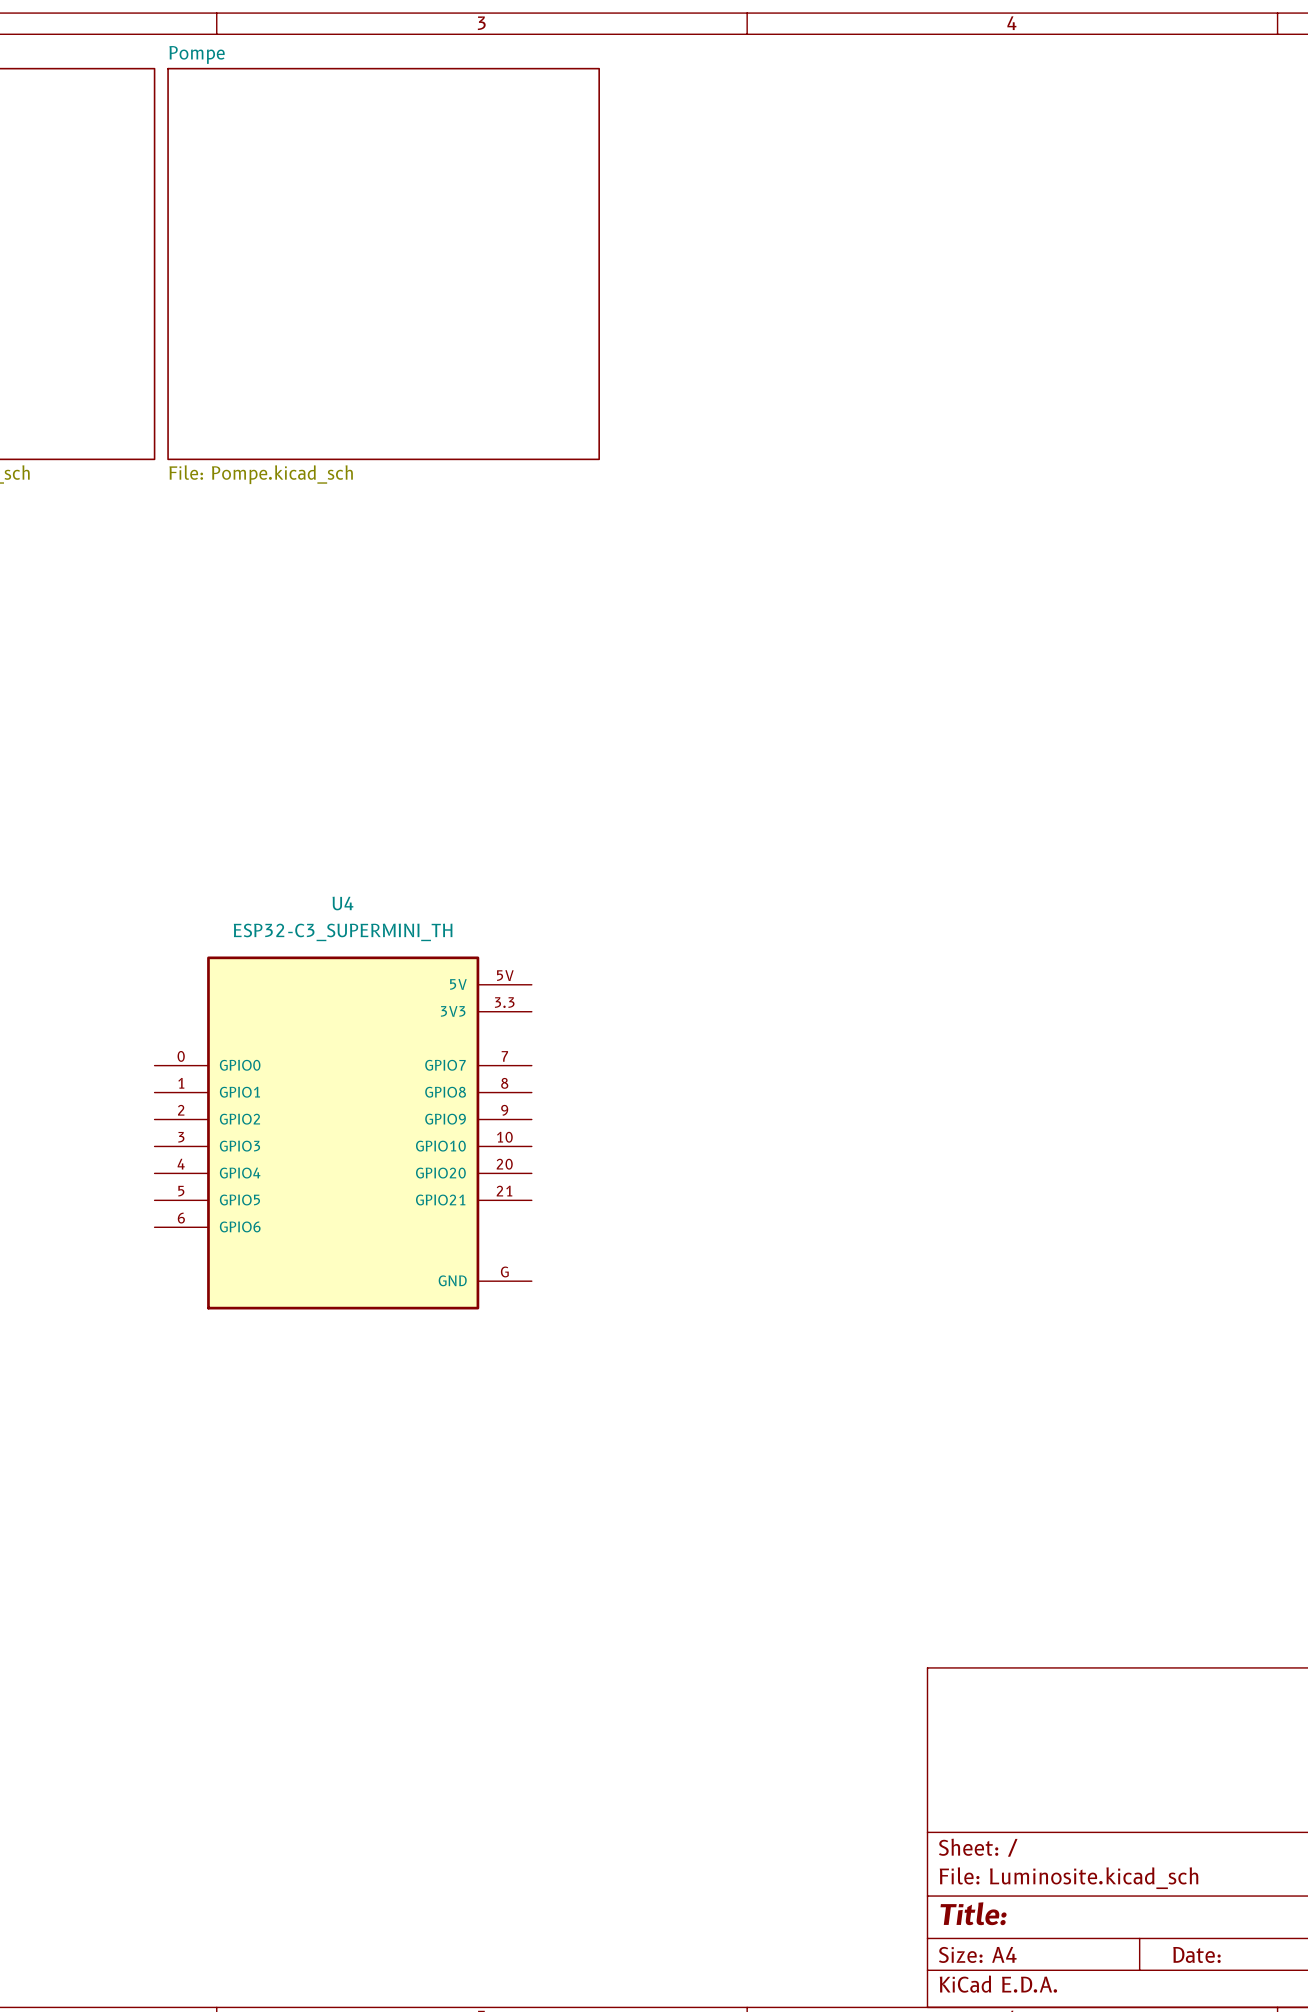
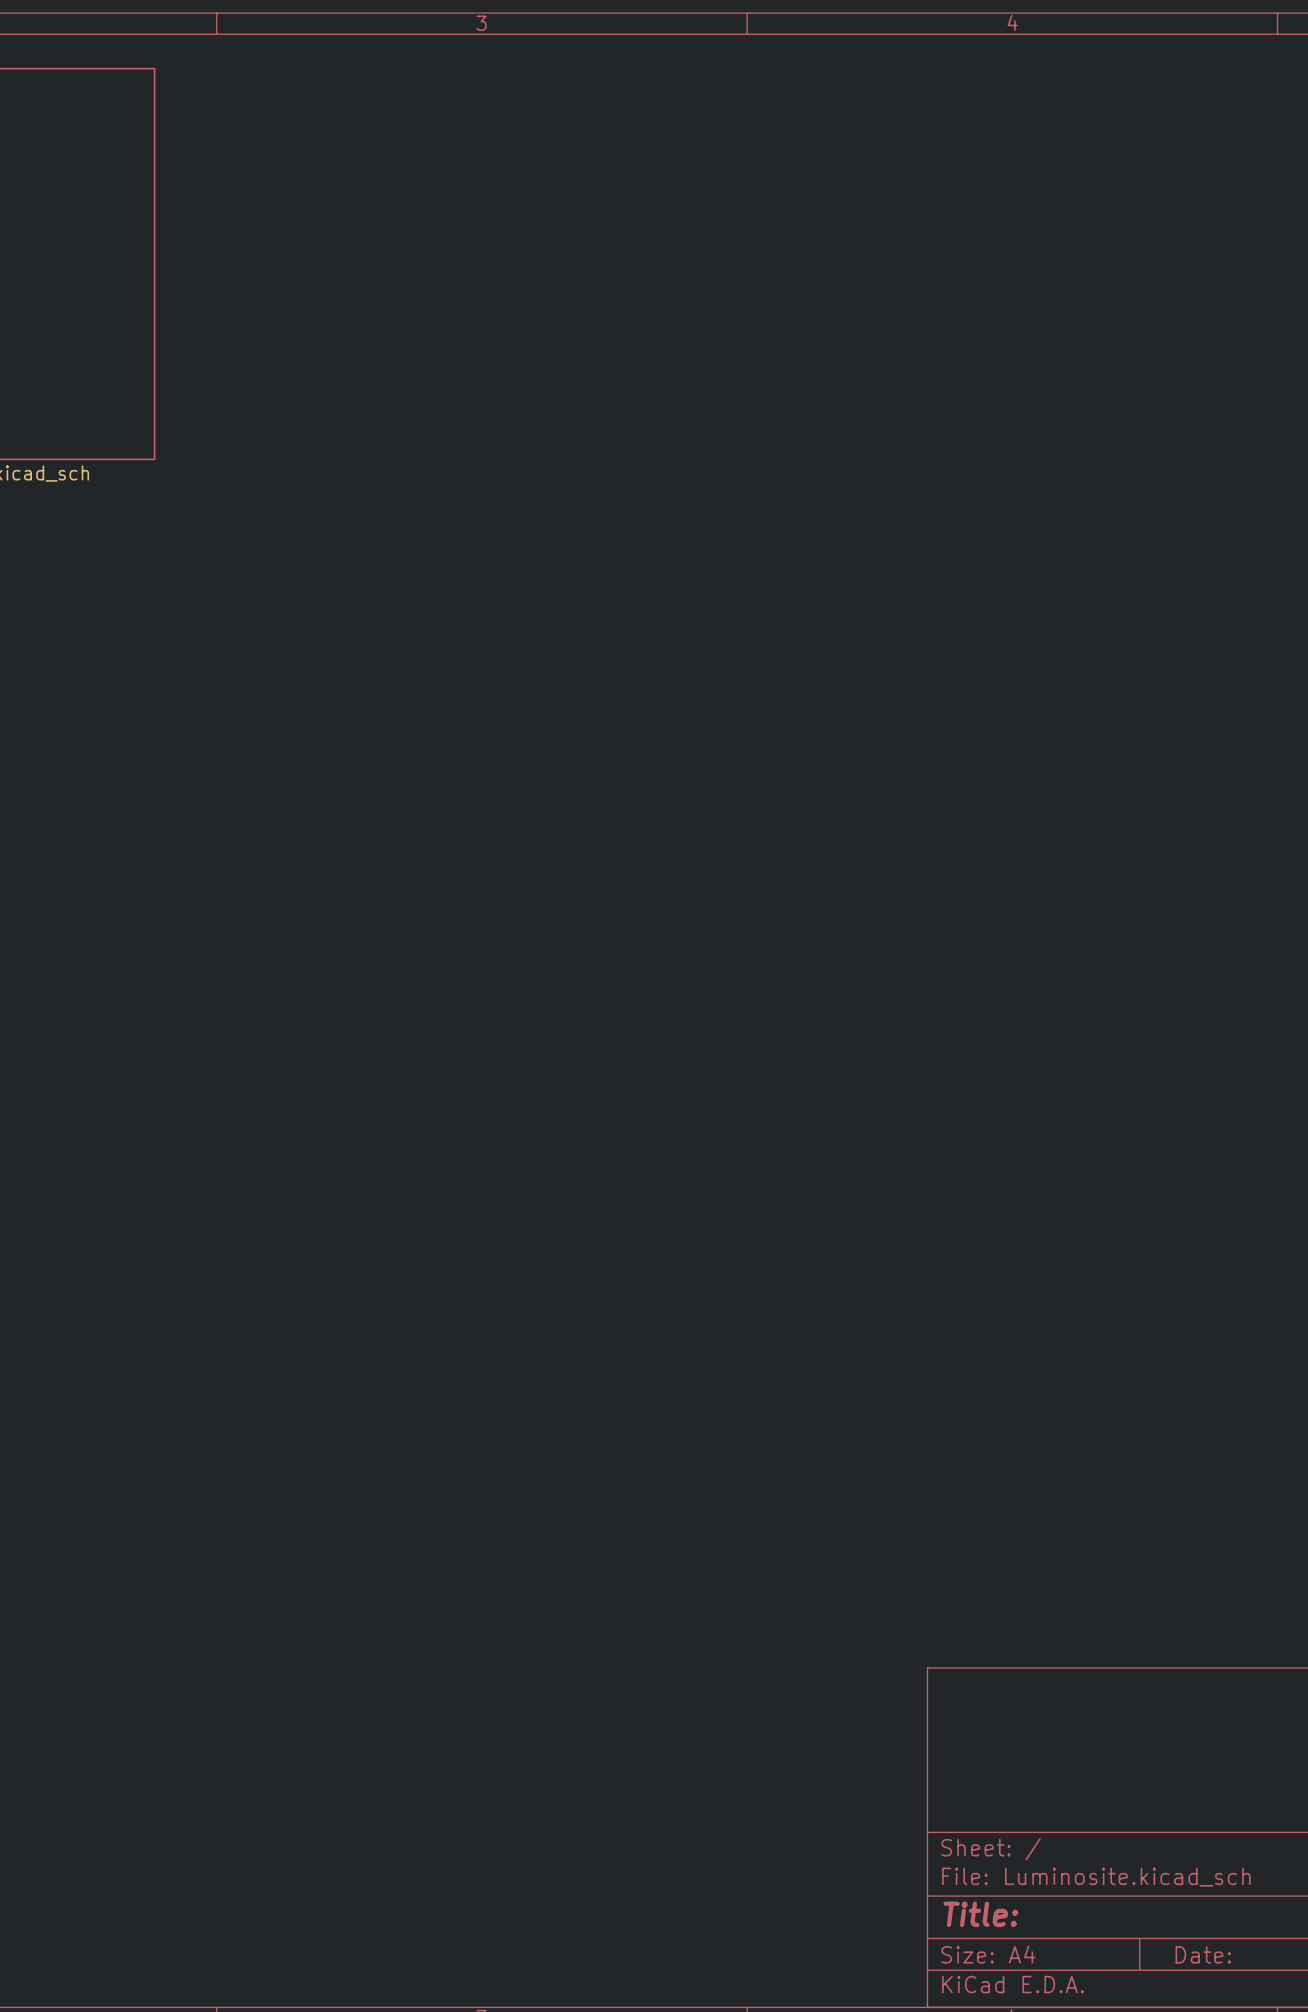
sheet Pompe: File: Pompe.kicad_sch (383, 264) -> none
U4: ESP32-C3_SUPERMINI_TH (343, 1132) -> none

